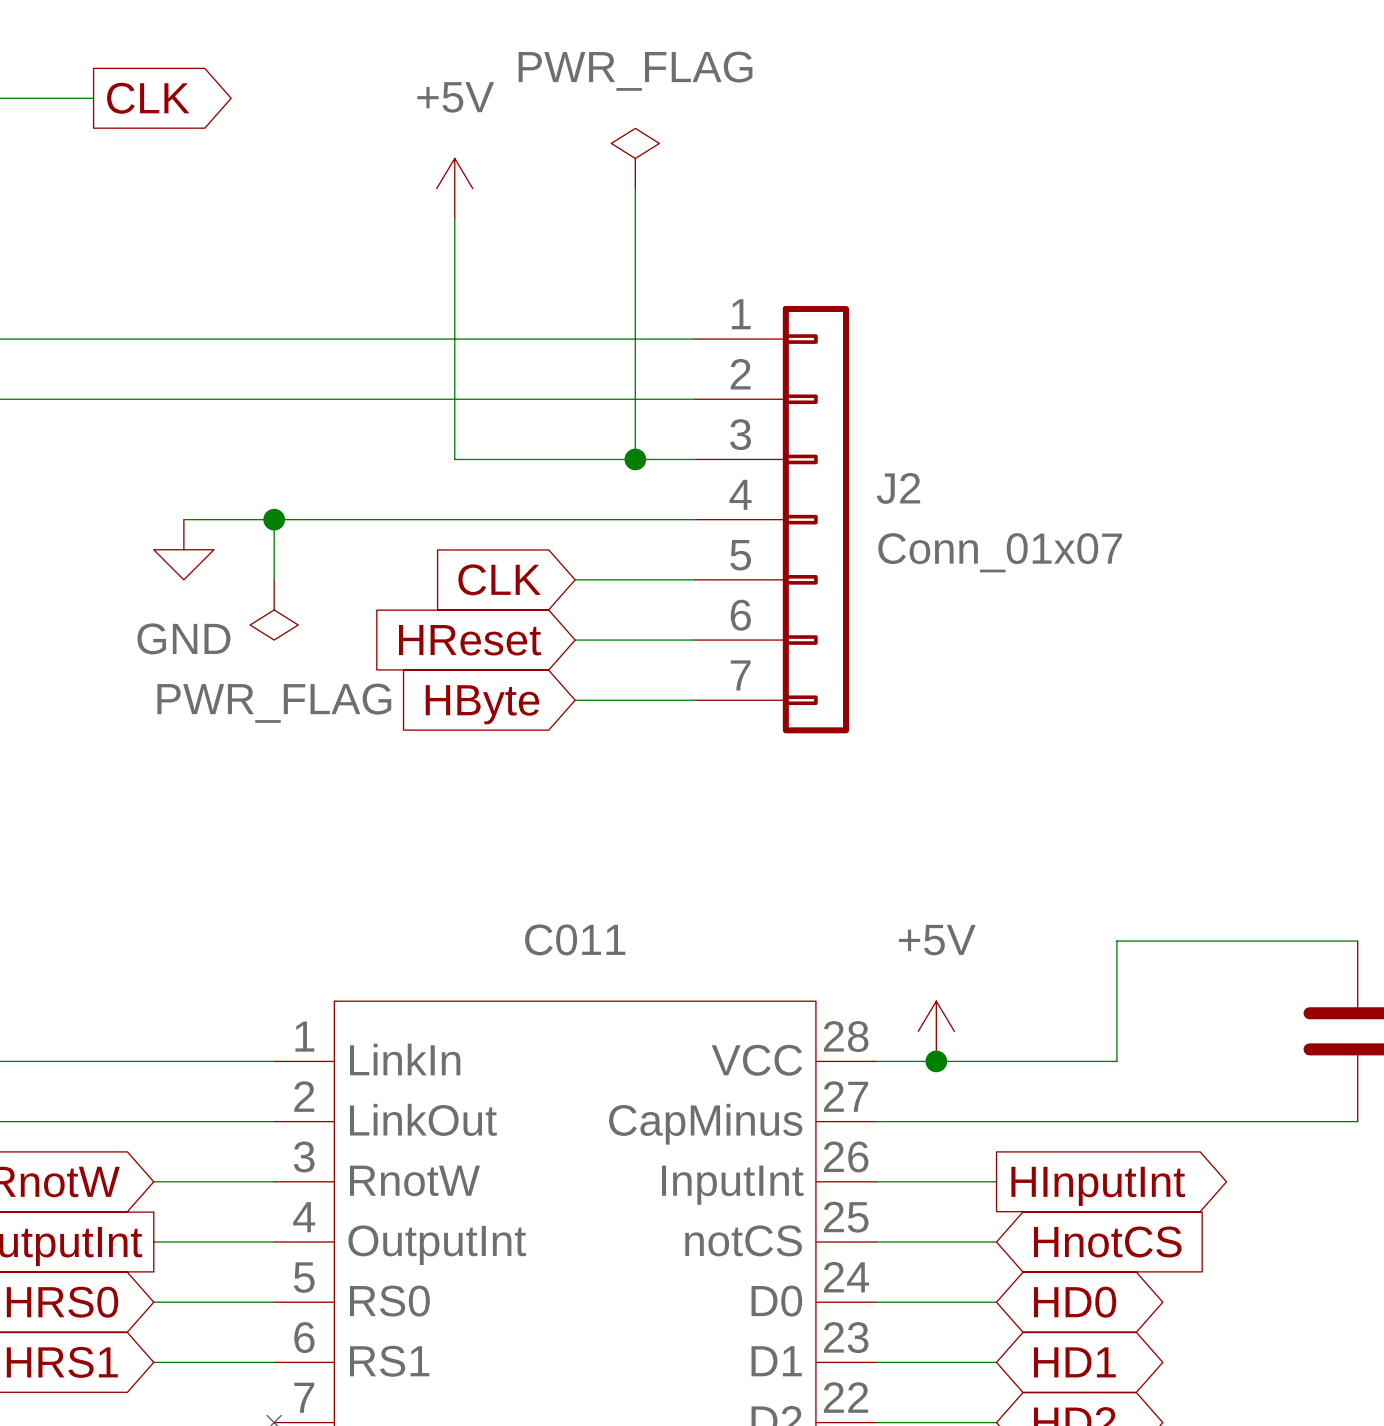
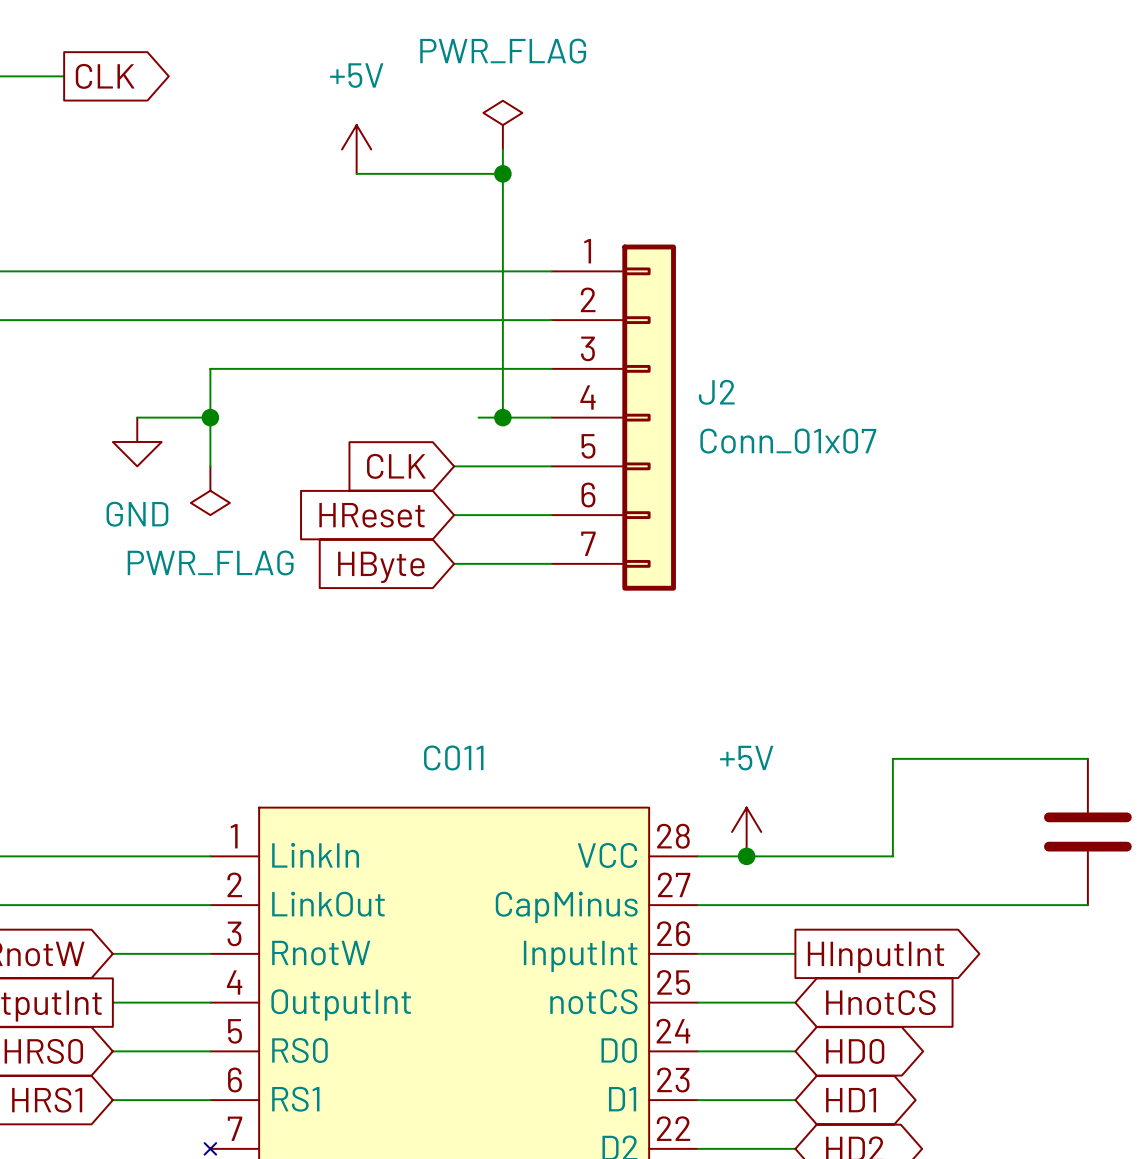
wire: (454, 218) (454, 459) -> (356, 173) (502, 173)
junction: none -> (502, 173)
wire: none -> (502, 368) (502, 417)
junction position: (635, 459) -> (502, 417)
wire: (274, 519) (605, 519) -> (210, 417) (210, 368) (356, 368)

